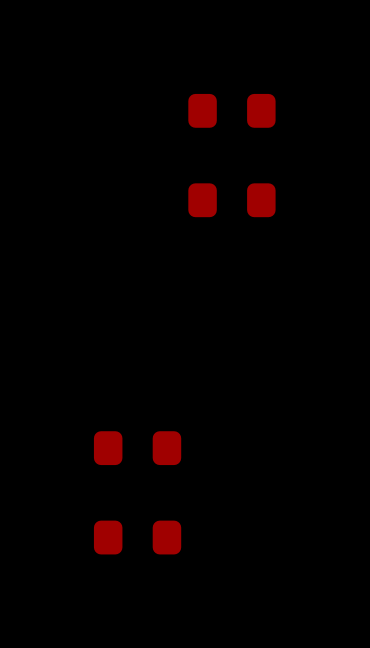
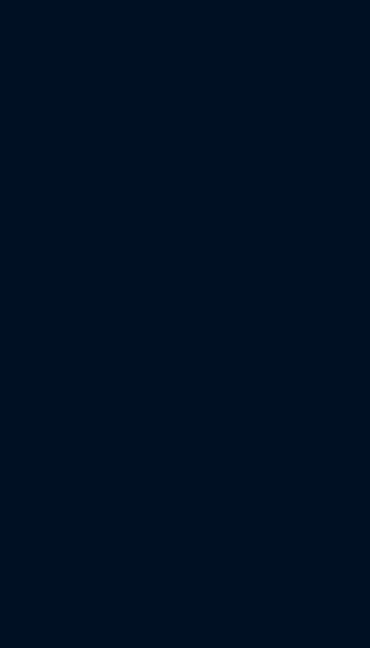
part: (231, 110) -> none
part: (231, 200) -> none
part: (137, 448) -> none
part: (137, 537) -> none

